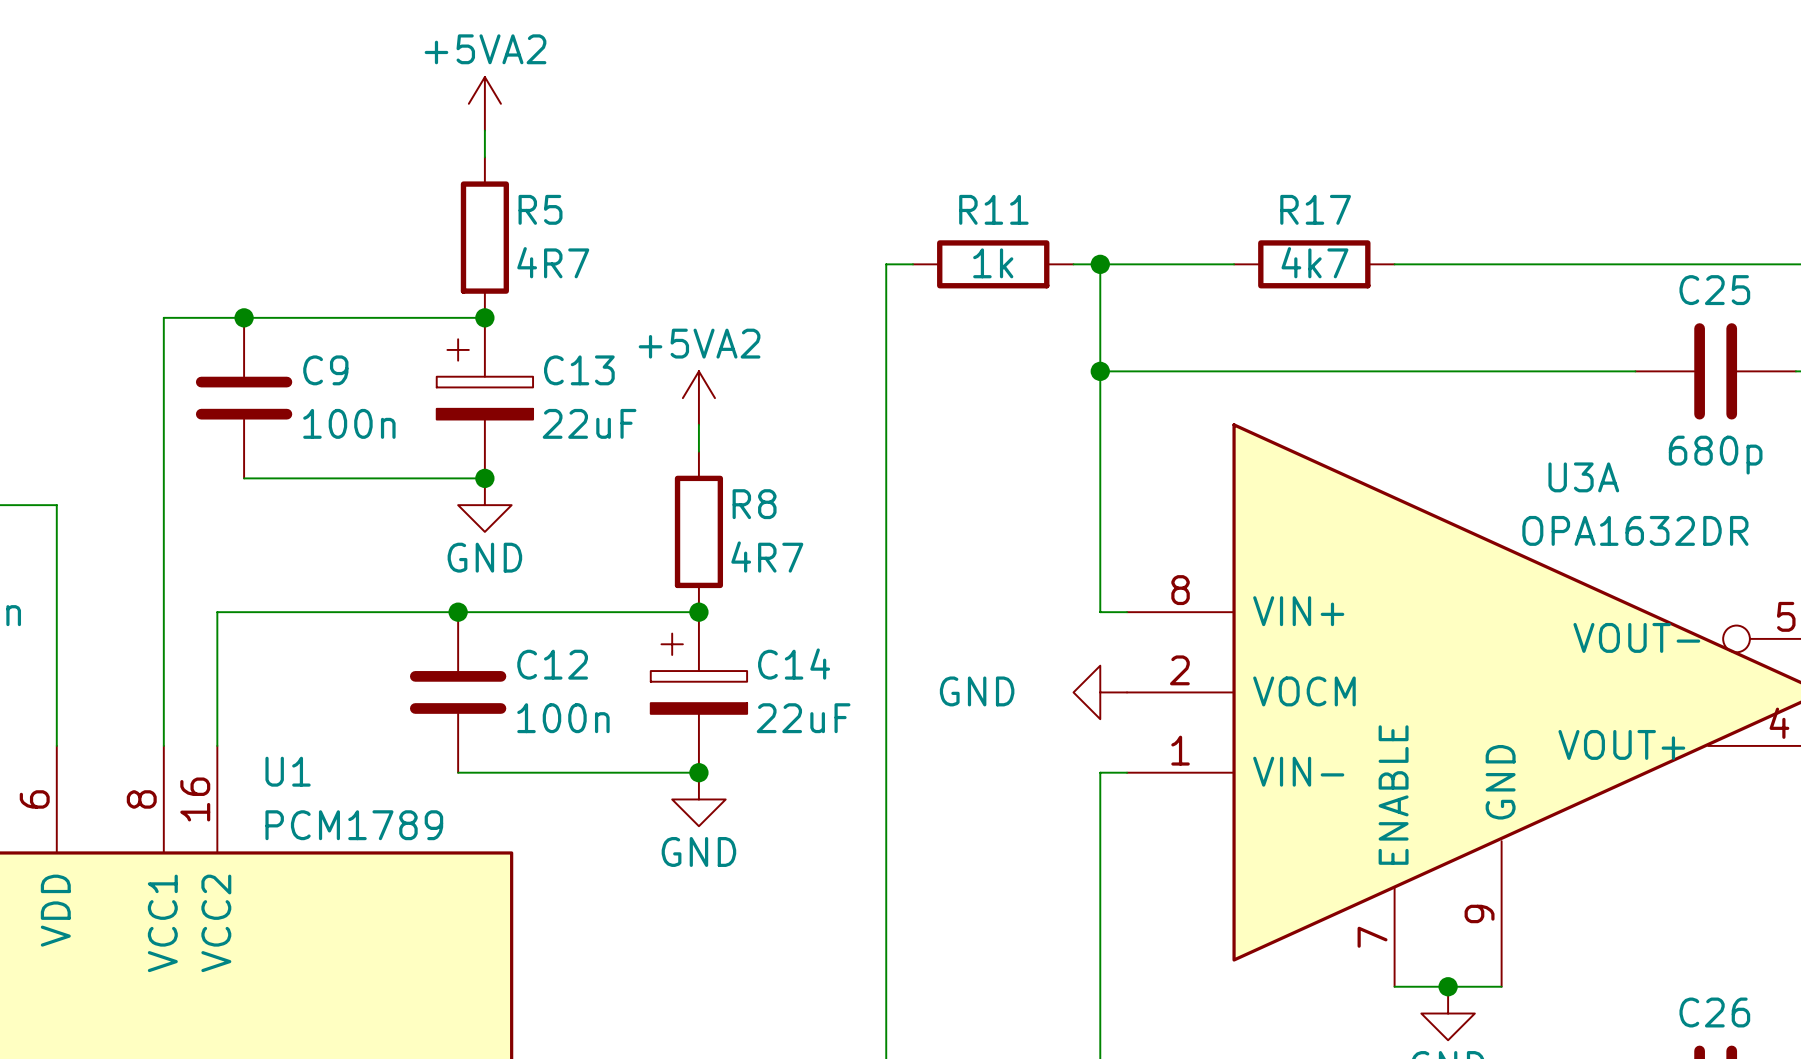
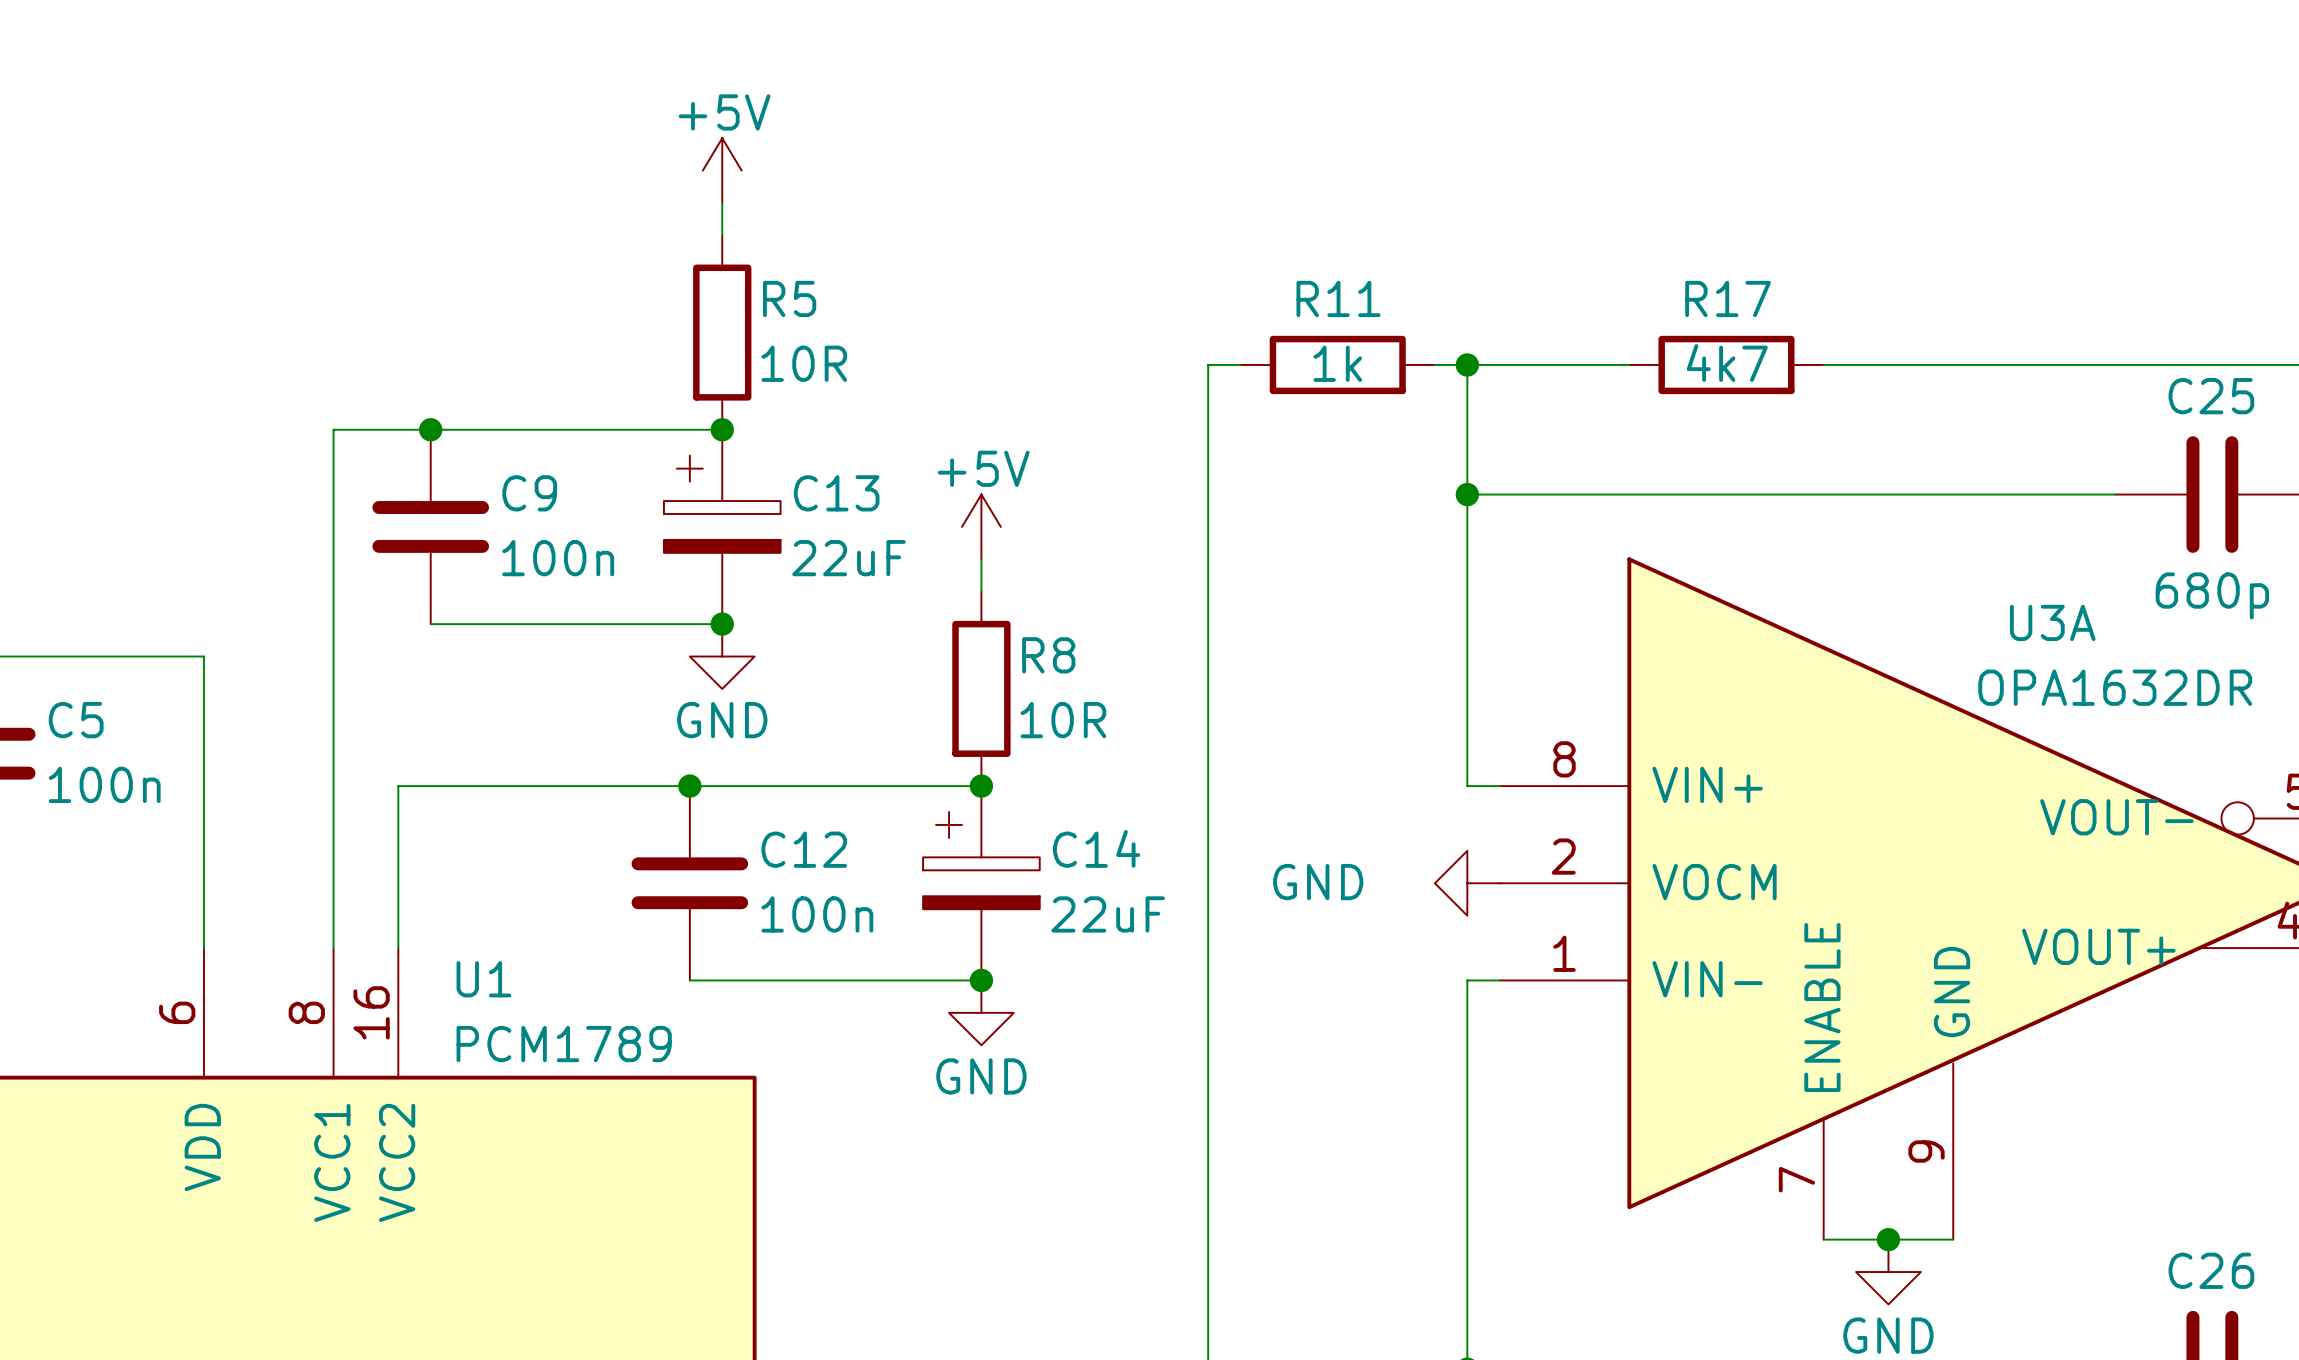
power symbol: +5VA2 (484, 103) -> +5V (722, 170)
R5 value: 4R7 (553, 262) -> 10R (804, 363)
power symbol: +5VA2 (698, 398) -> +5V (981, 526)
R8 value: 4R7 (767, 557) -> 10R (1063, 720)

